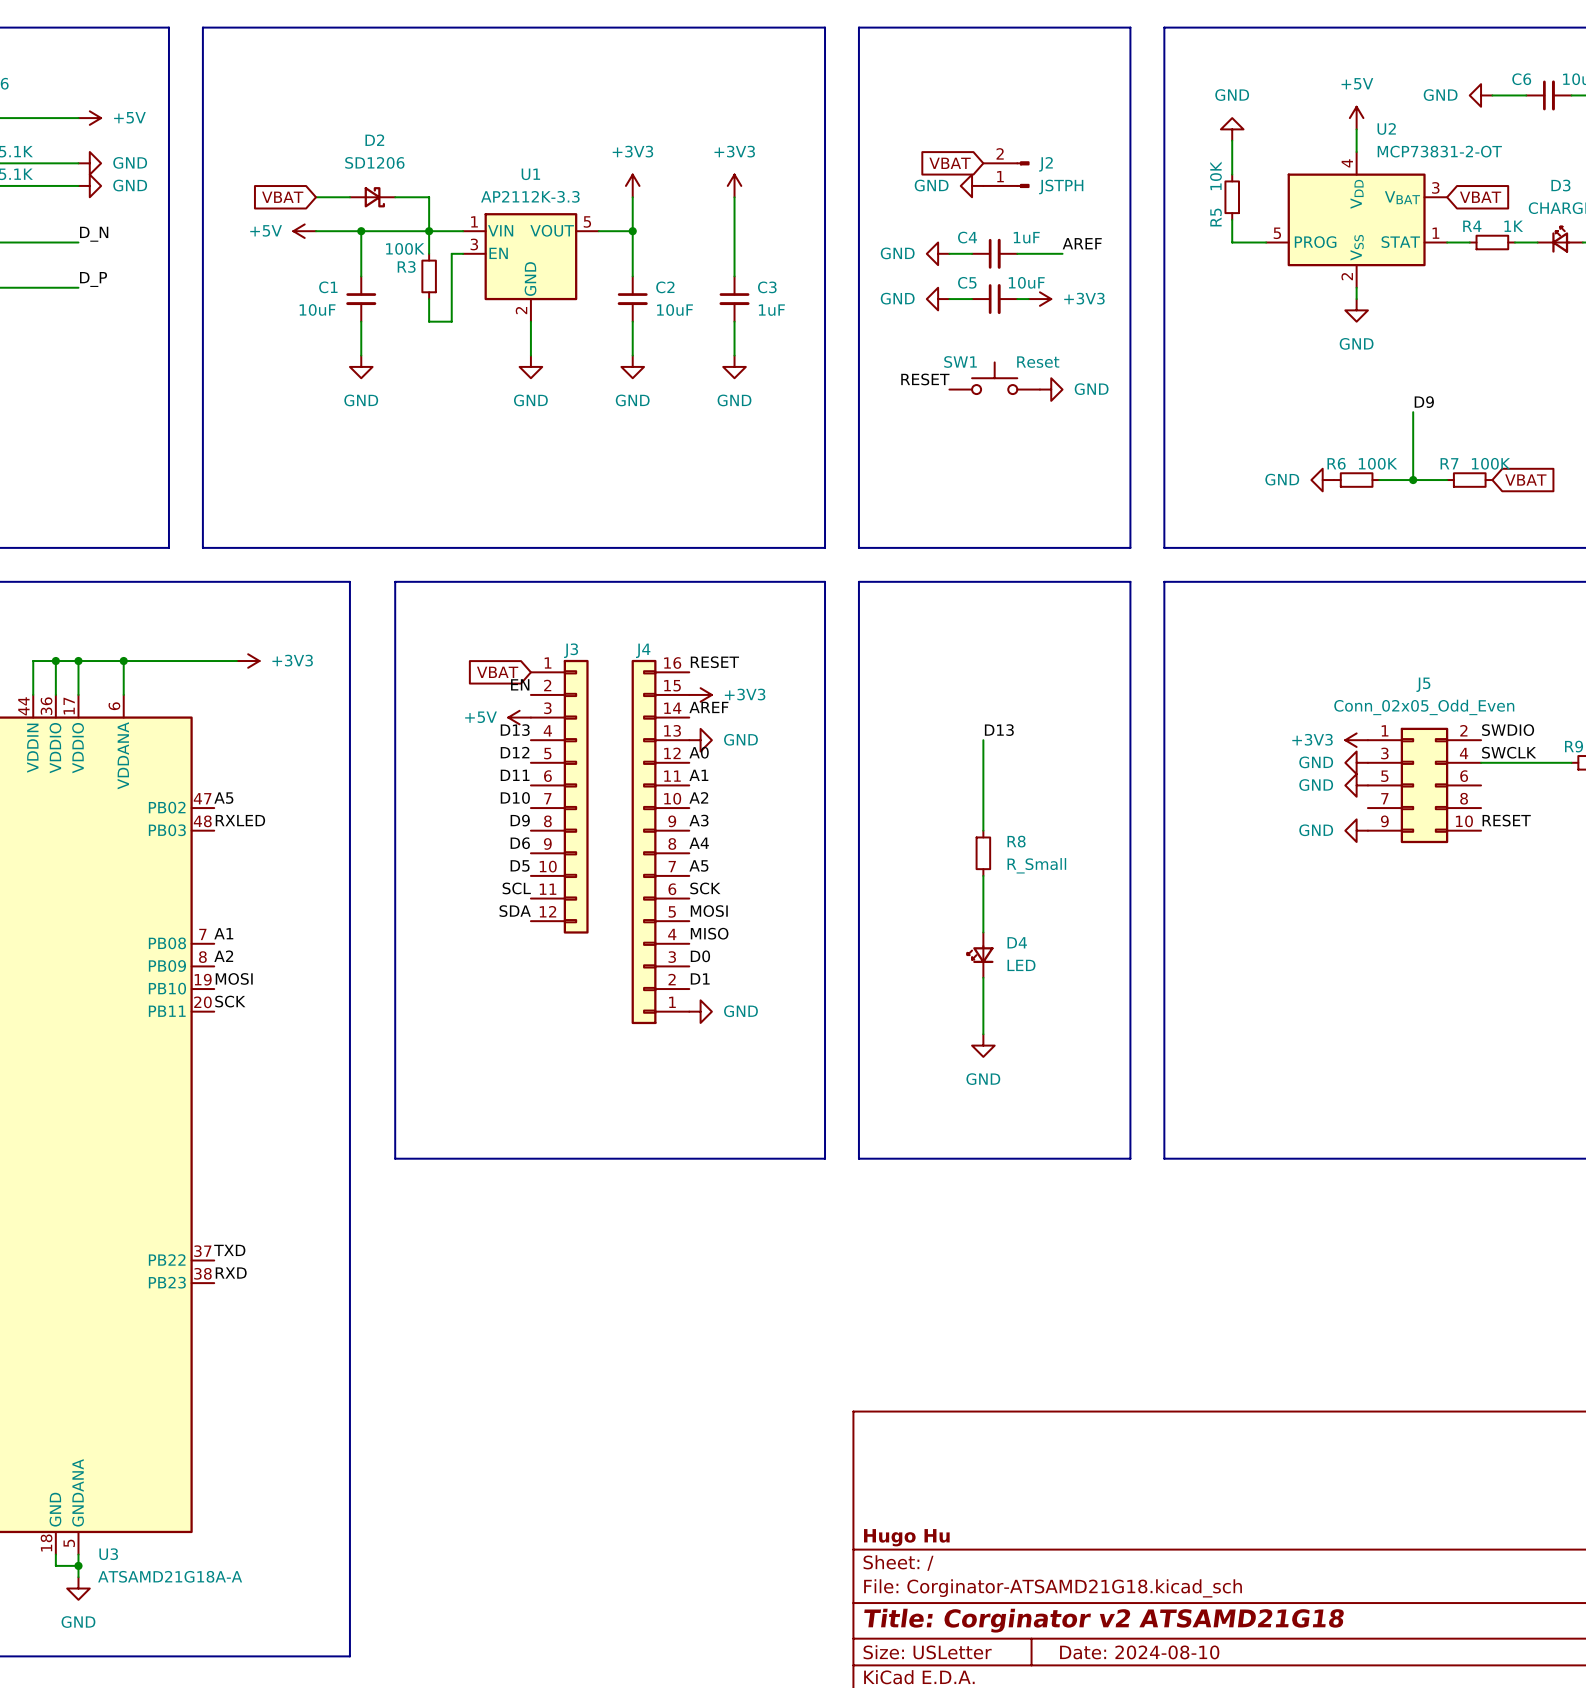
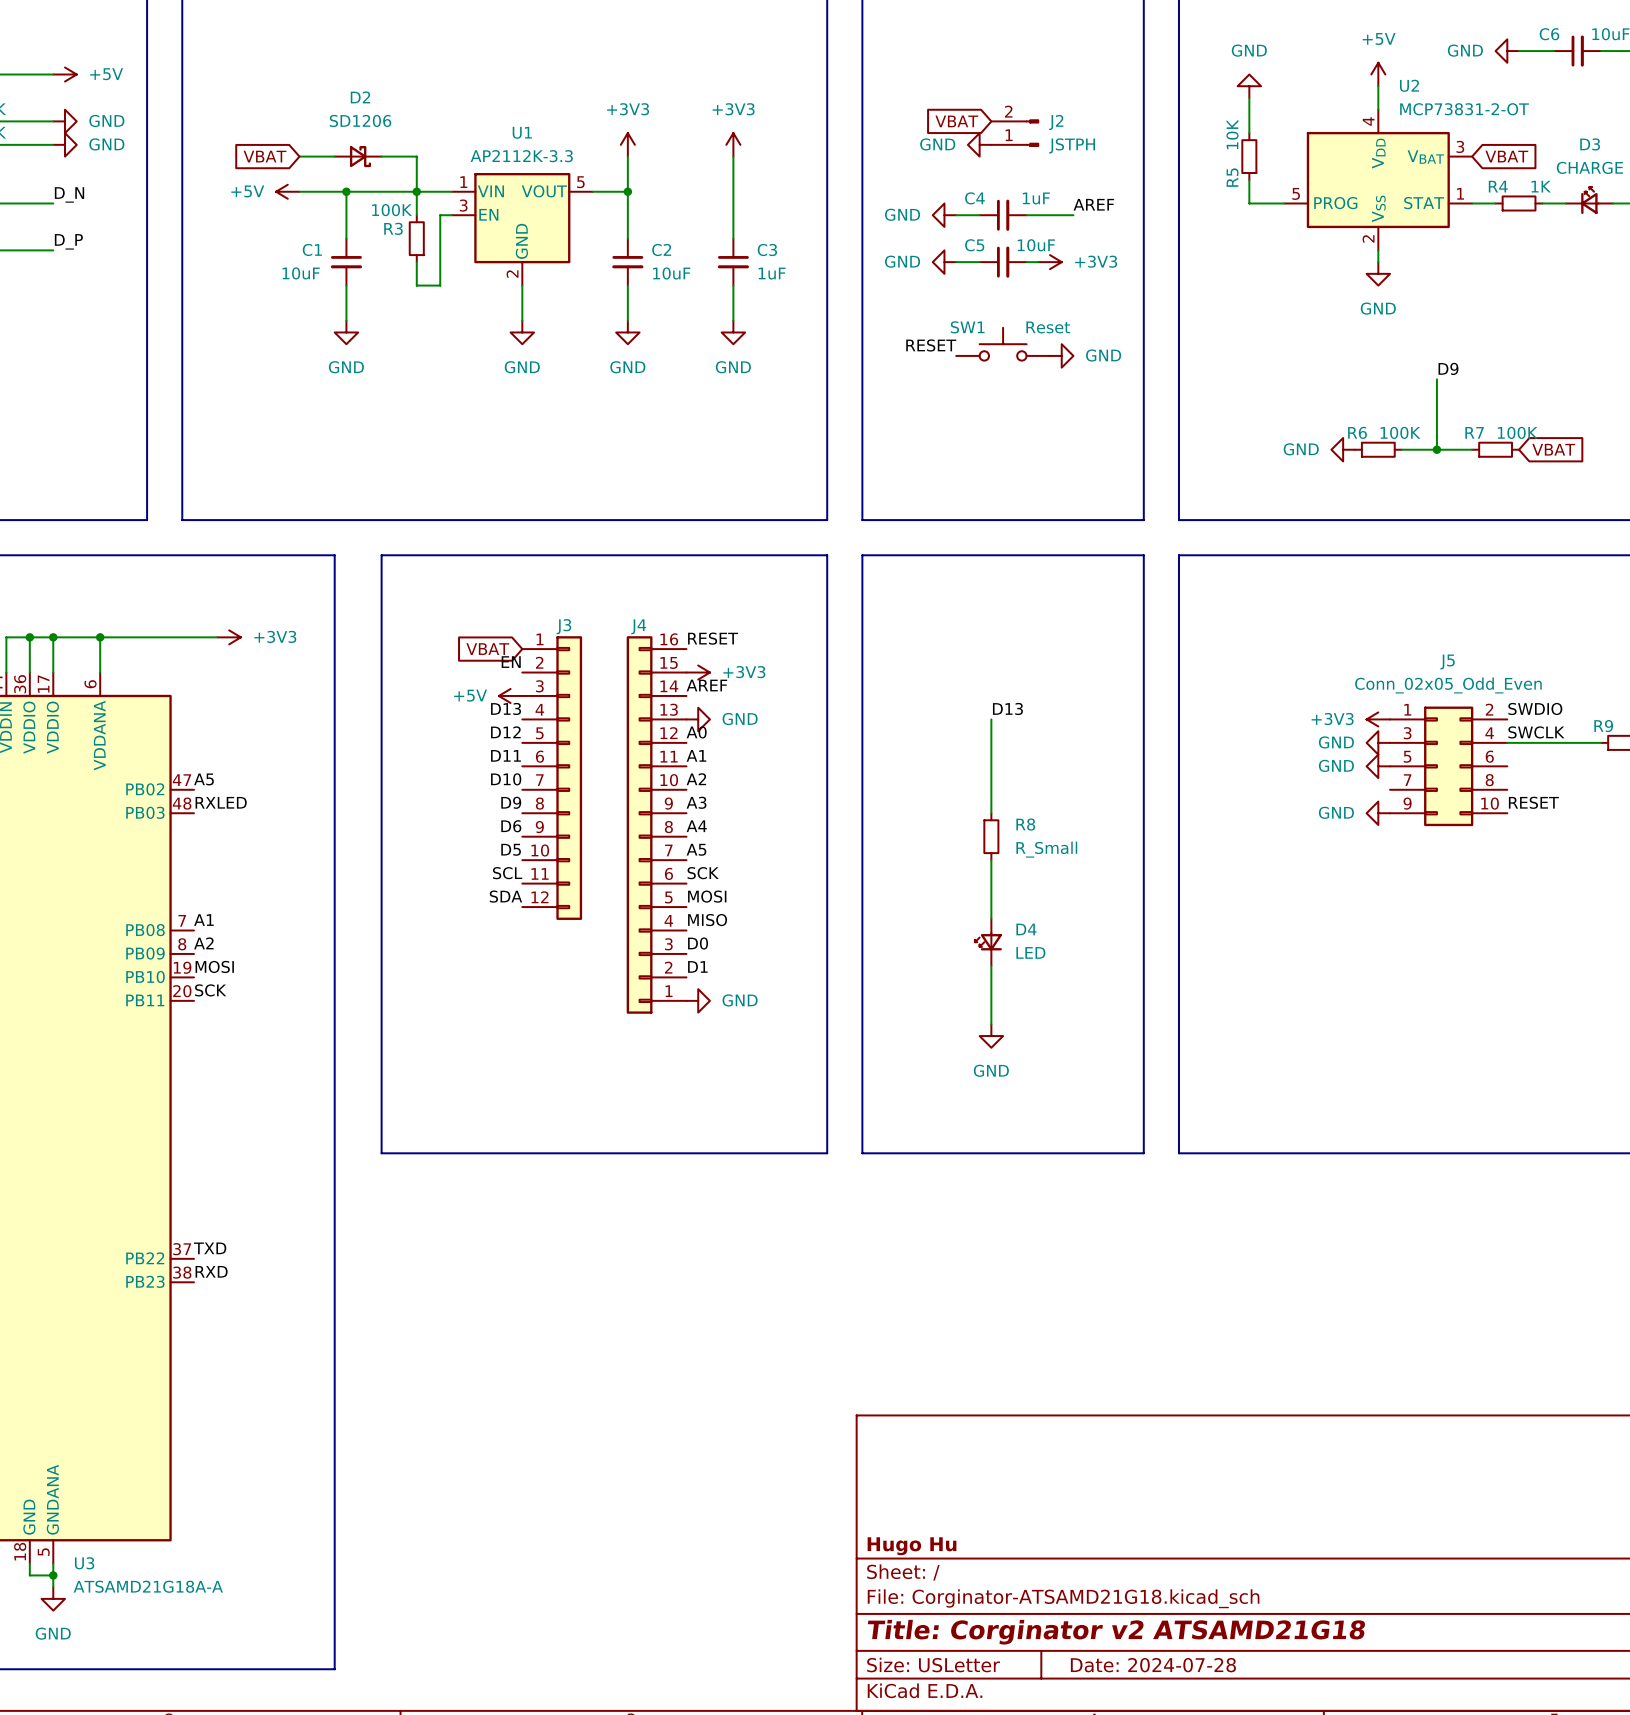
title block: Date: 2024-08-10 (1139, 1652) -> Date: 2024-07-28 (1153, 1665)

